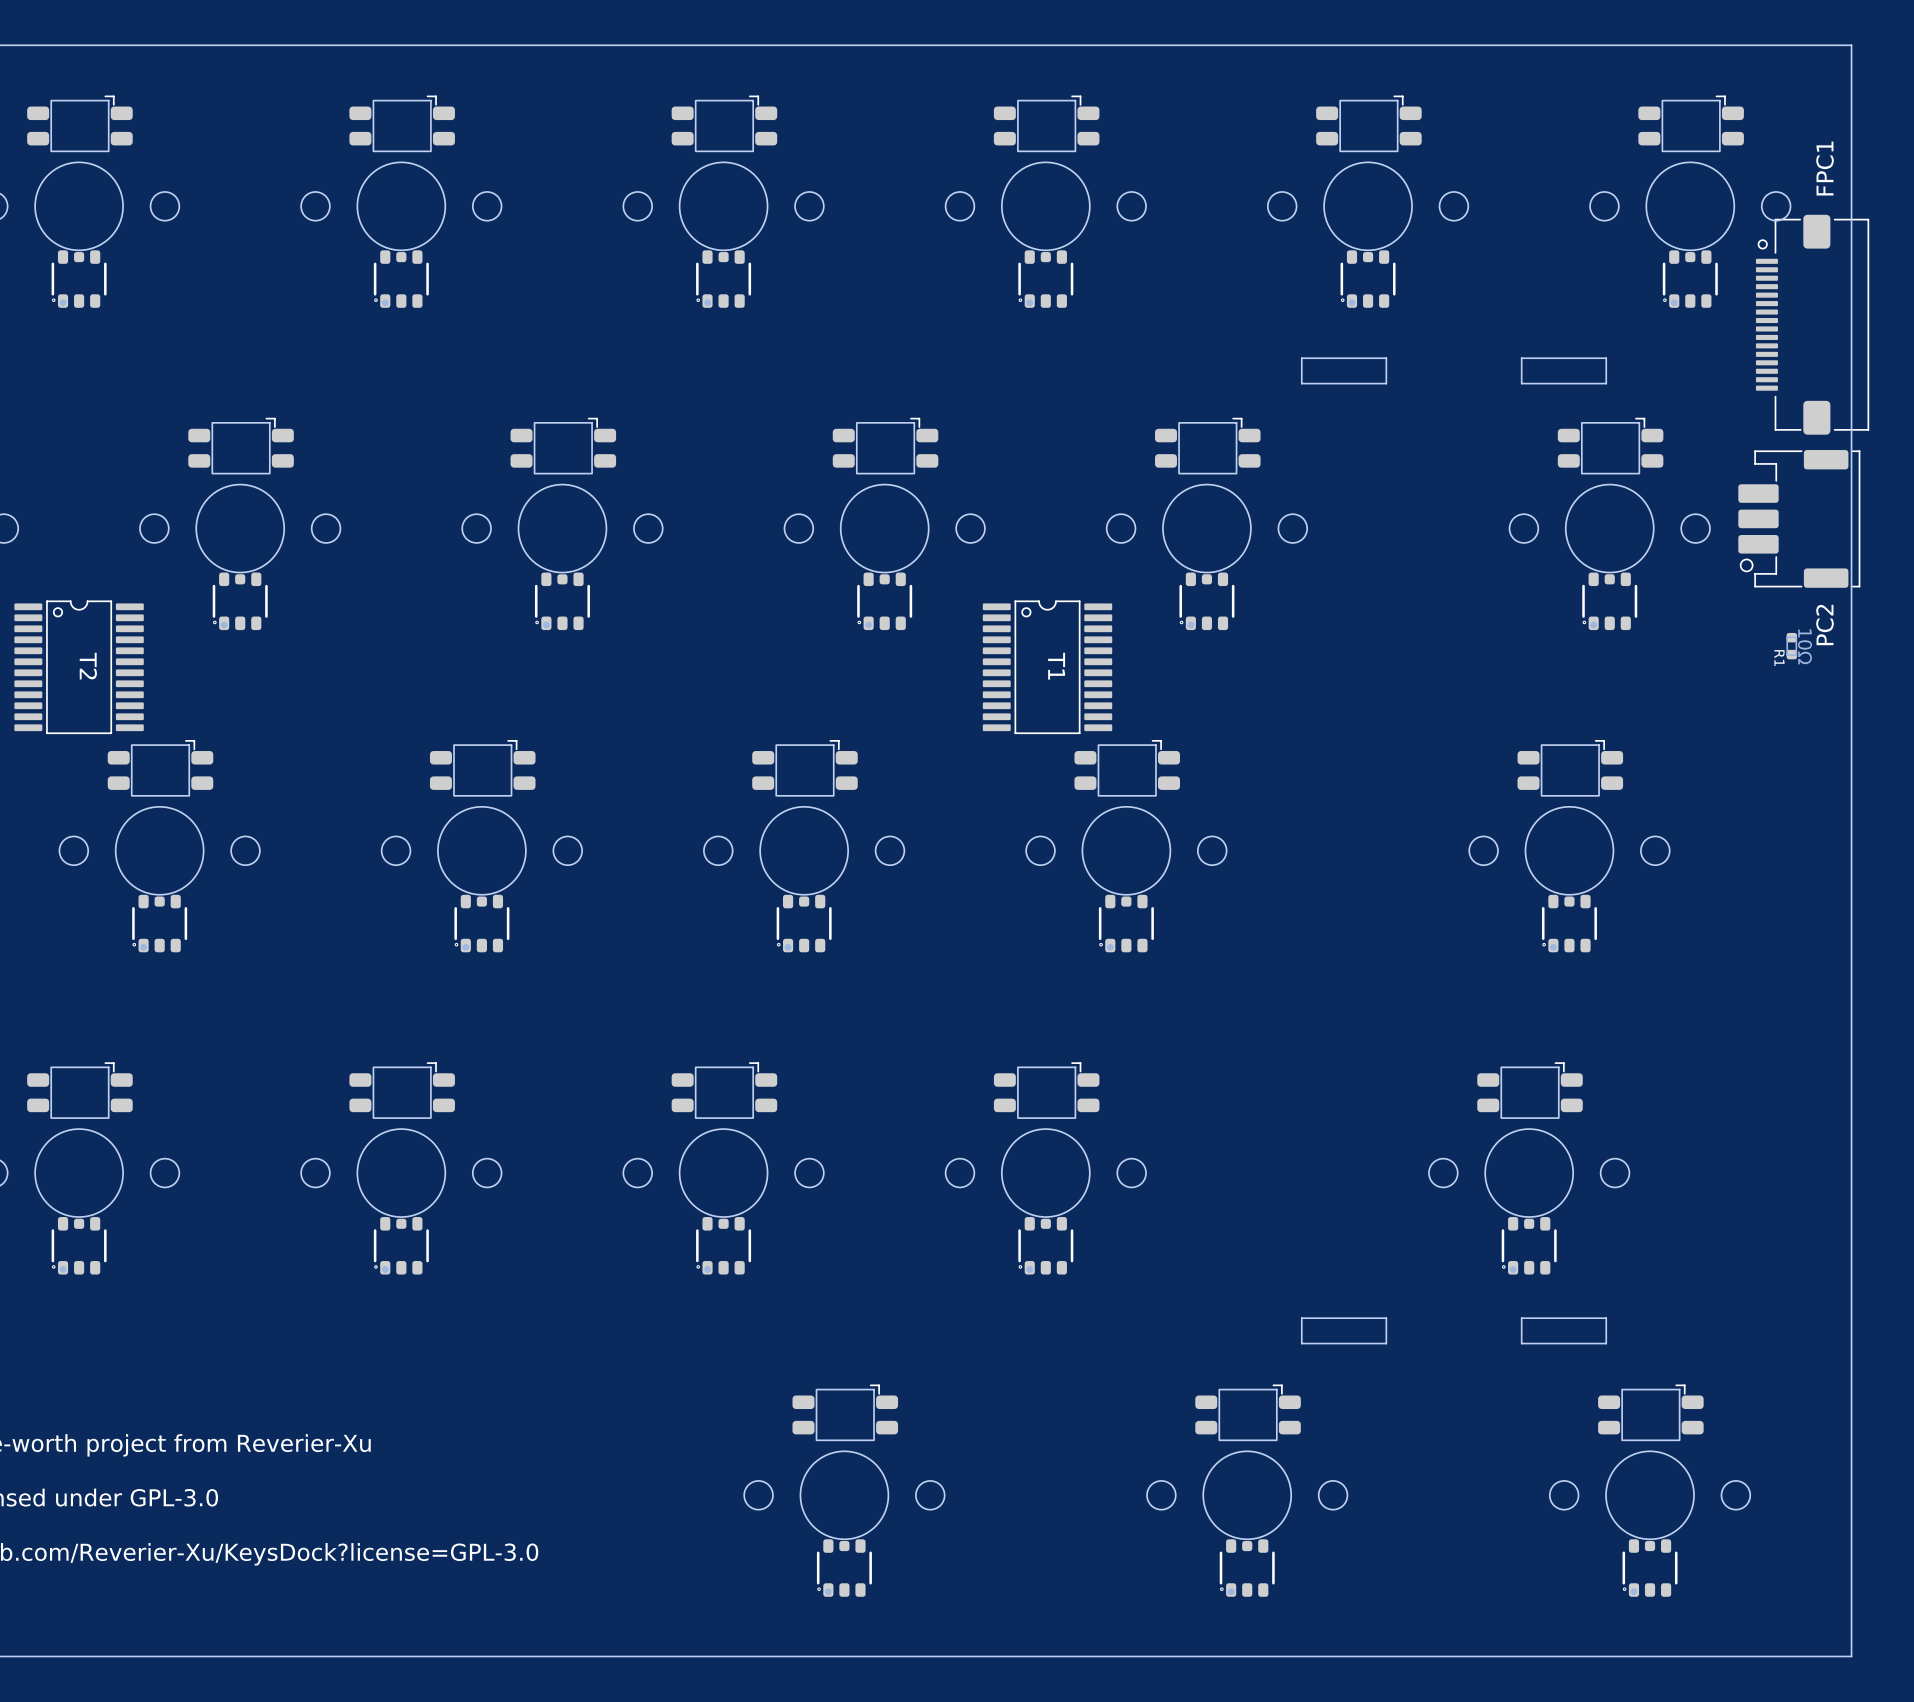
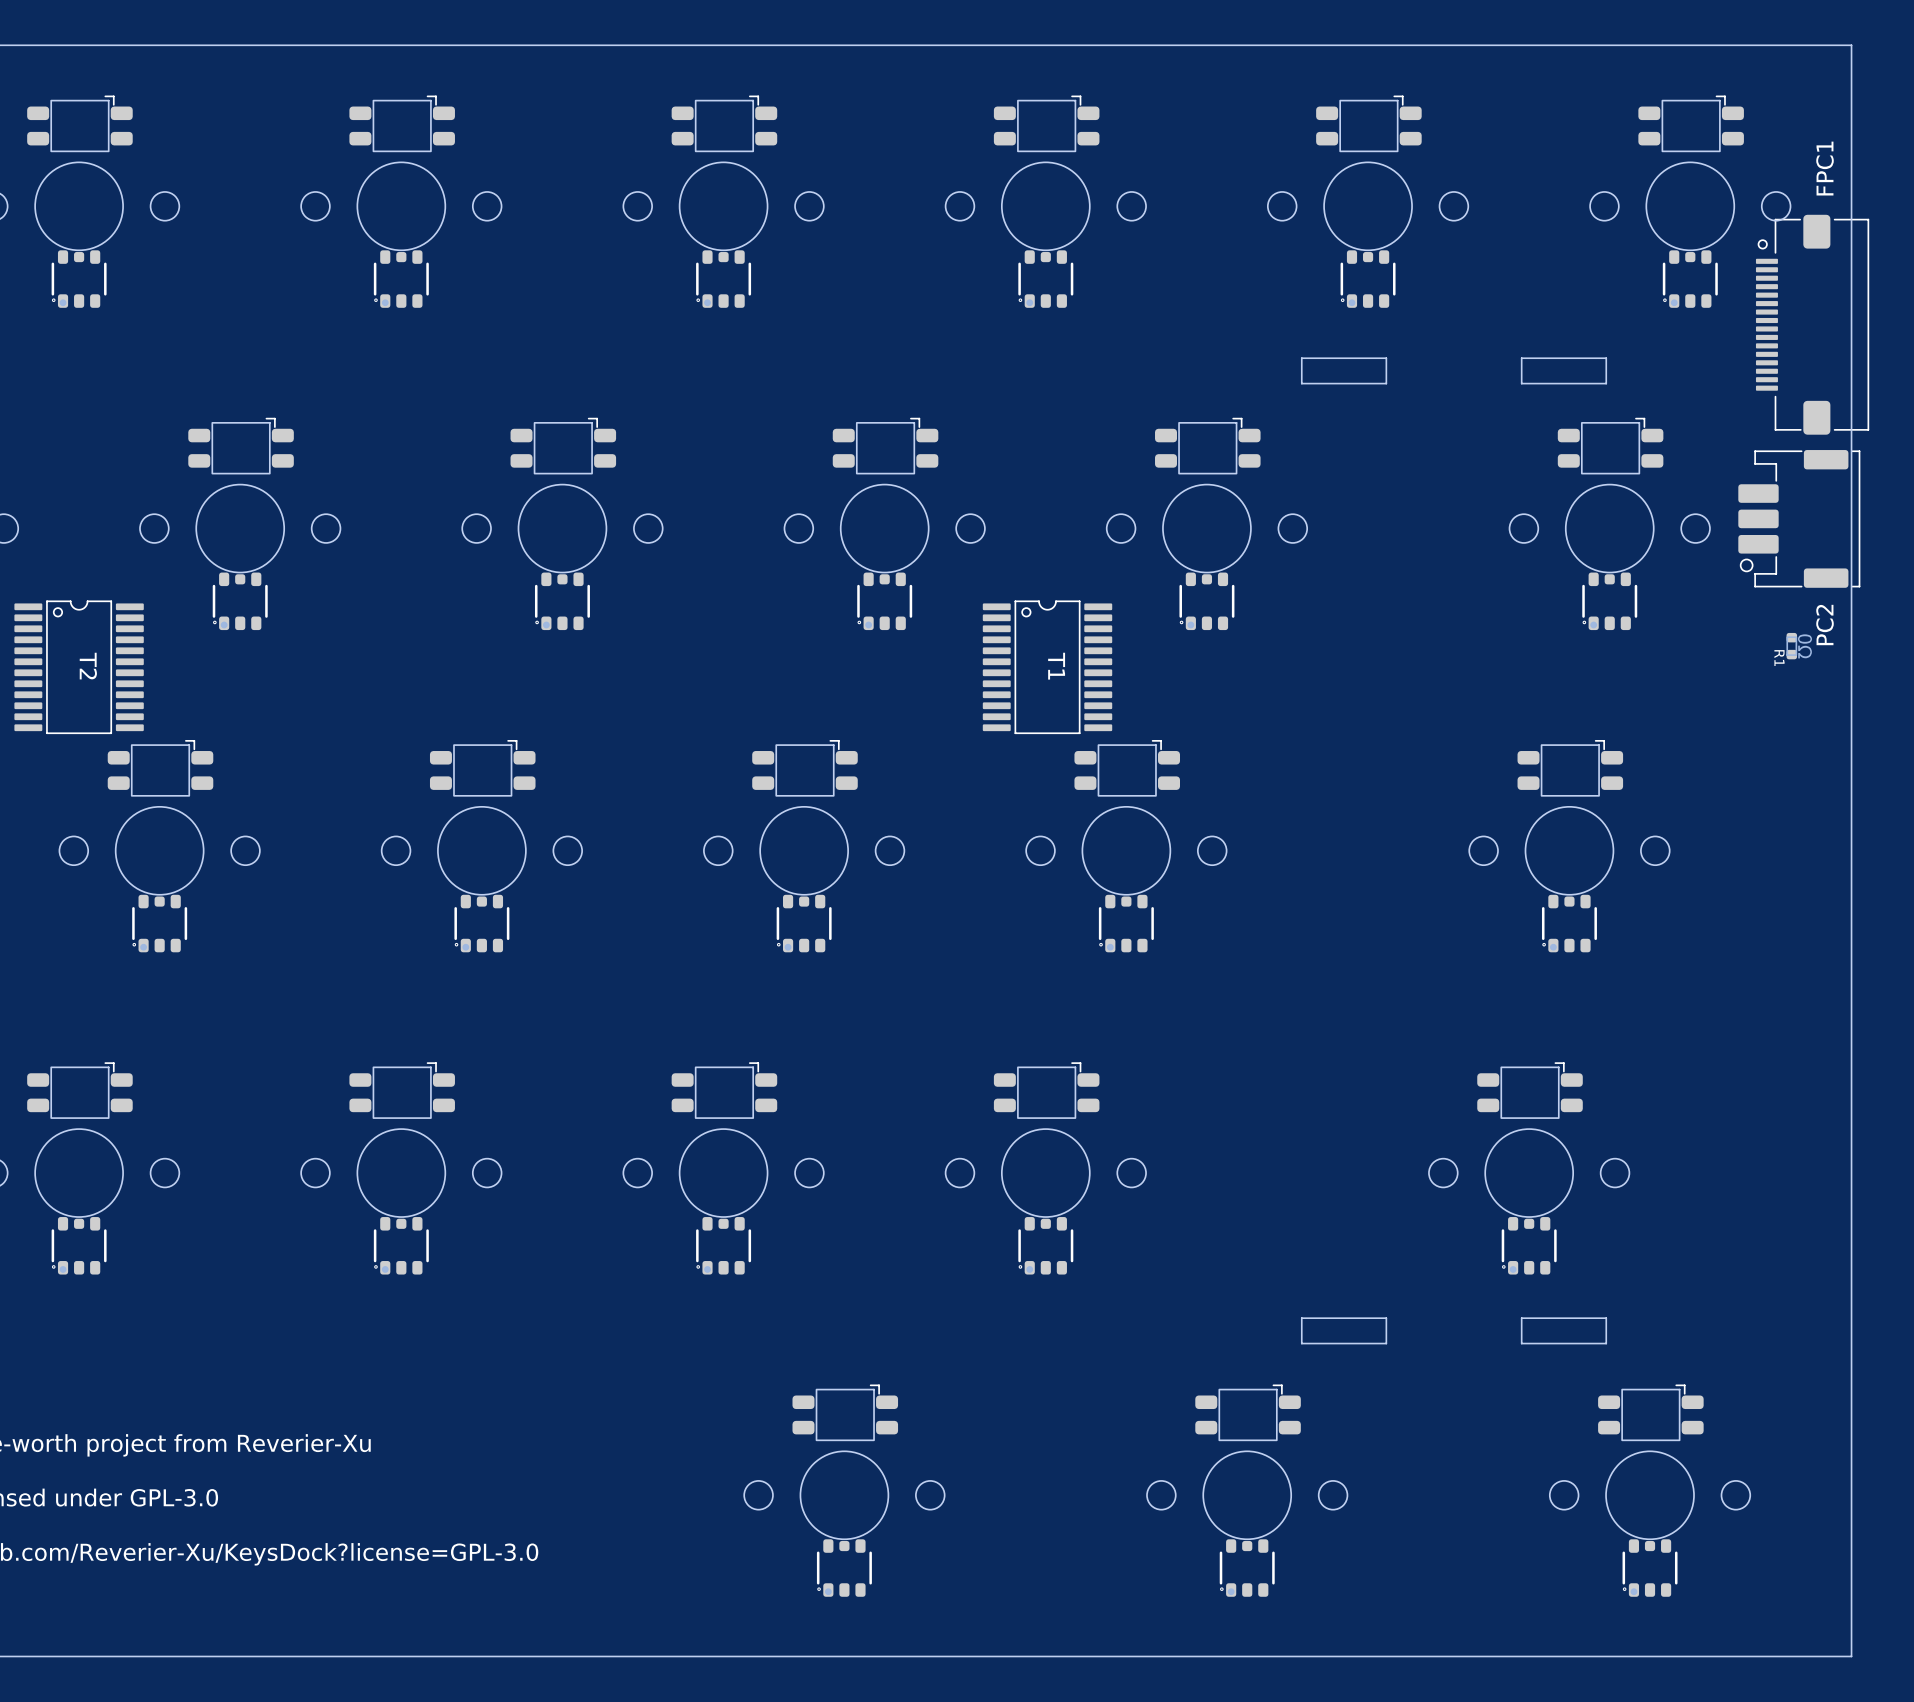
R1 value: 10Ω (1804, 646) -> 0Ω (1804, 646)

